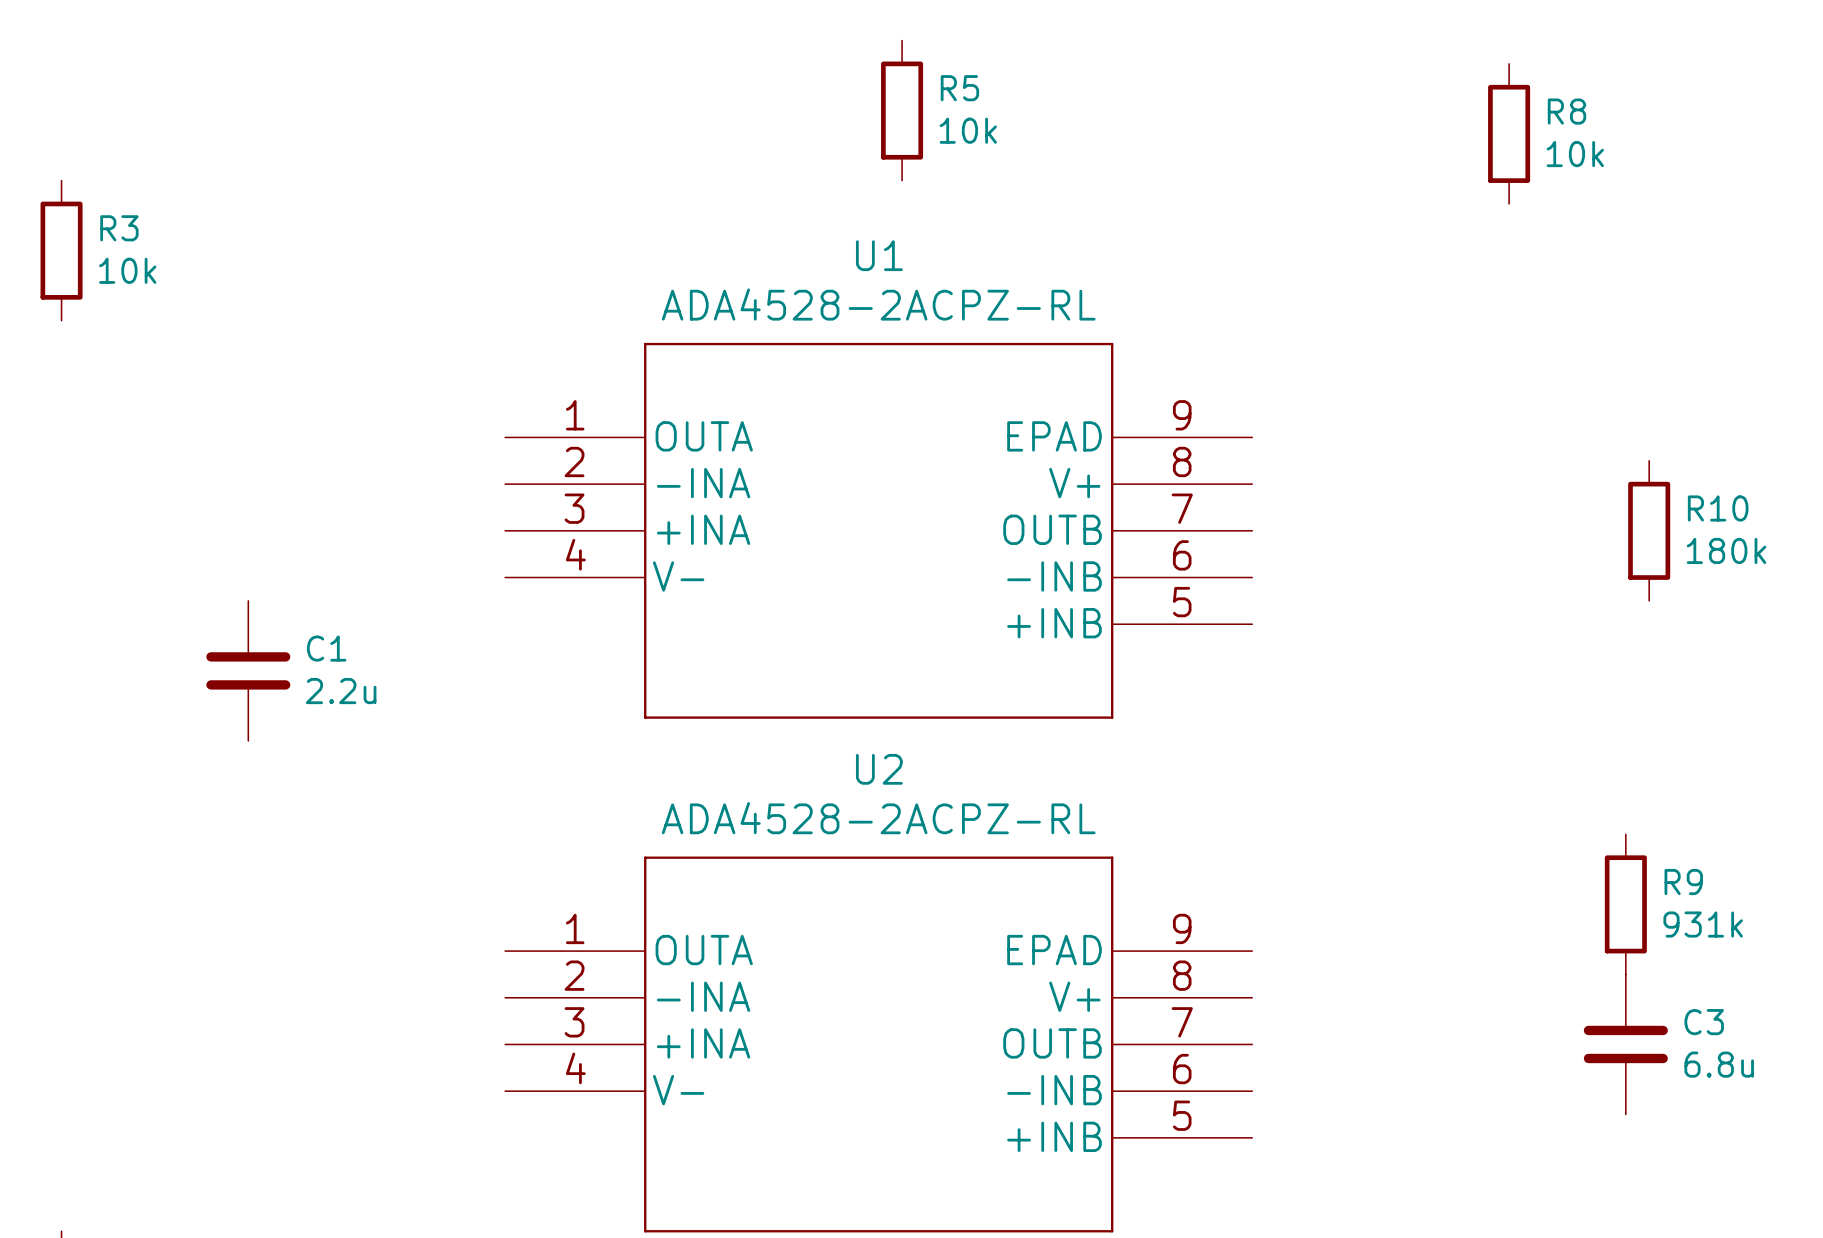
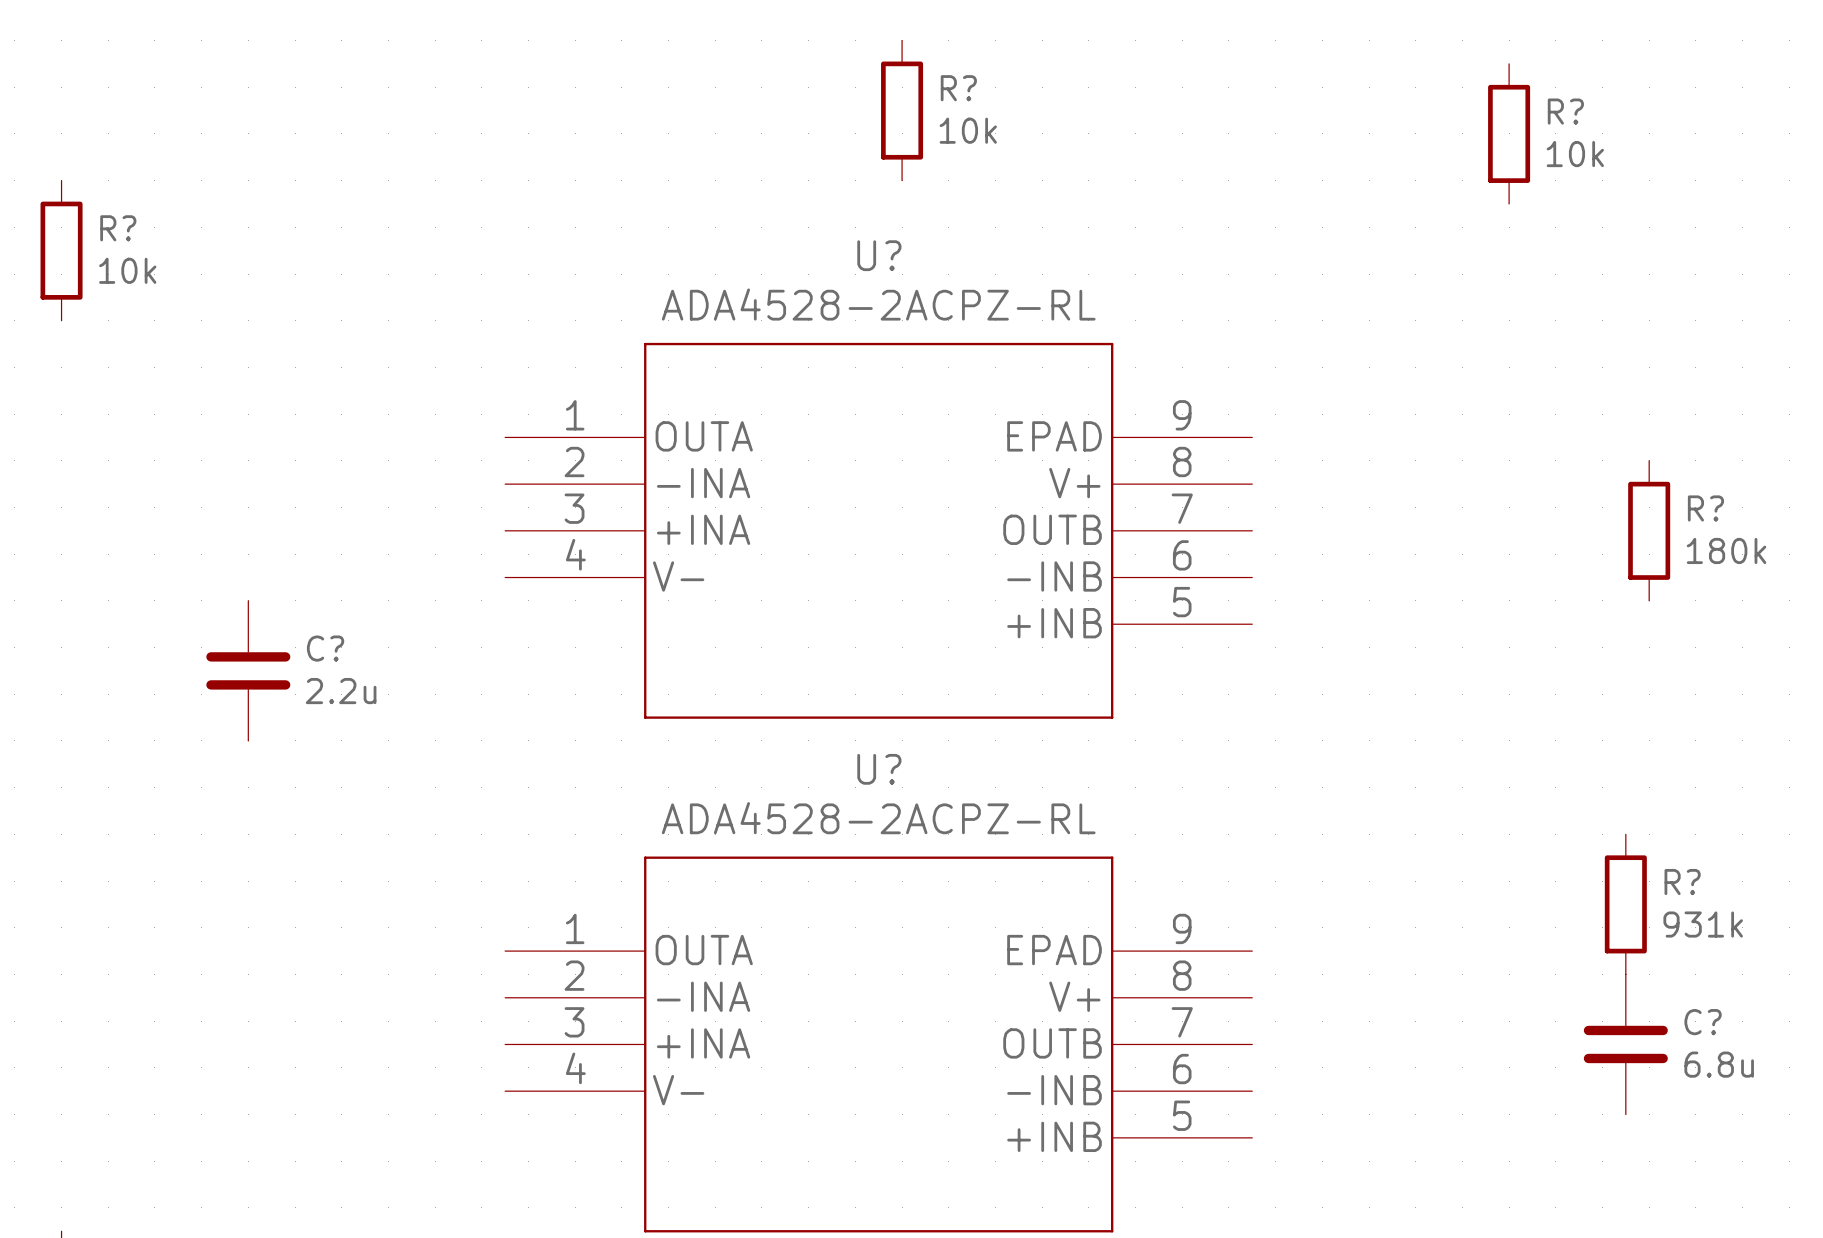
R5 name: R5 (959, 88) -> R? (958, 88)
R8 name: R8 (1566, 111) -> R? (1565, 111)
R3 name: R3 (119, 228) -> R? (118, 228)
U1 name: U1 (879, 255) -> U? (879, 255)
R10 name: R10 (1718, 508) -> R? (1705, 508)
C1 name: C1 (326, 648) -> C? (325, 648)
U2 name: U2 (879, 769) -> U? (879, 769)
R9 name: R9 (1683, 882) -> R? (1682, 882)
C3 name: C3 (1704, 1022) -> C? (1703, 1022)

